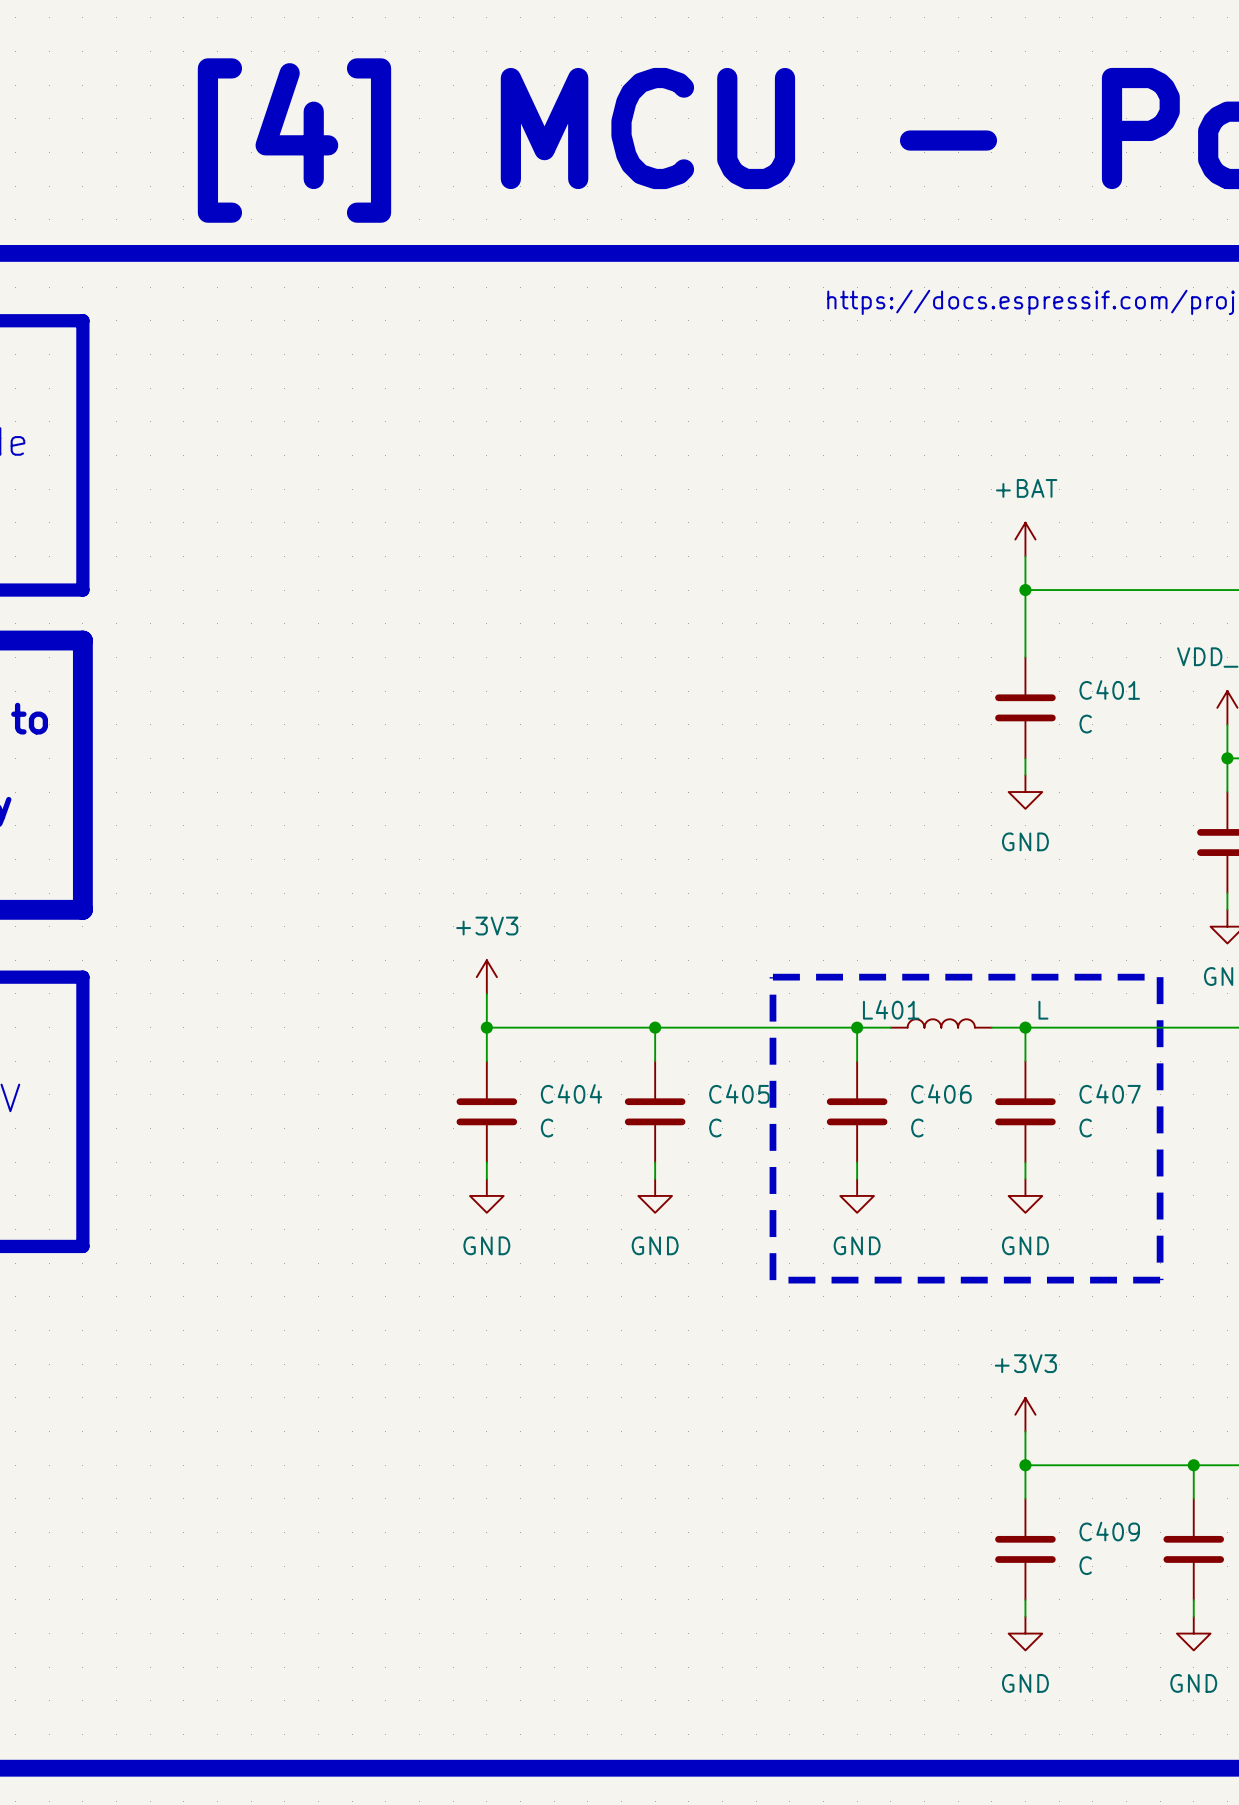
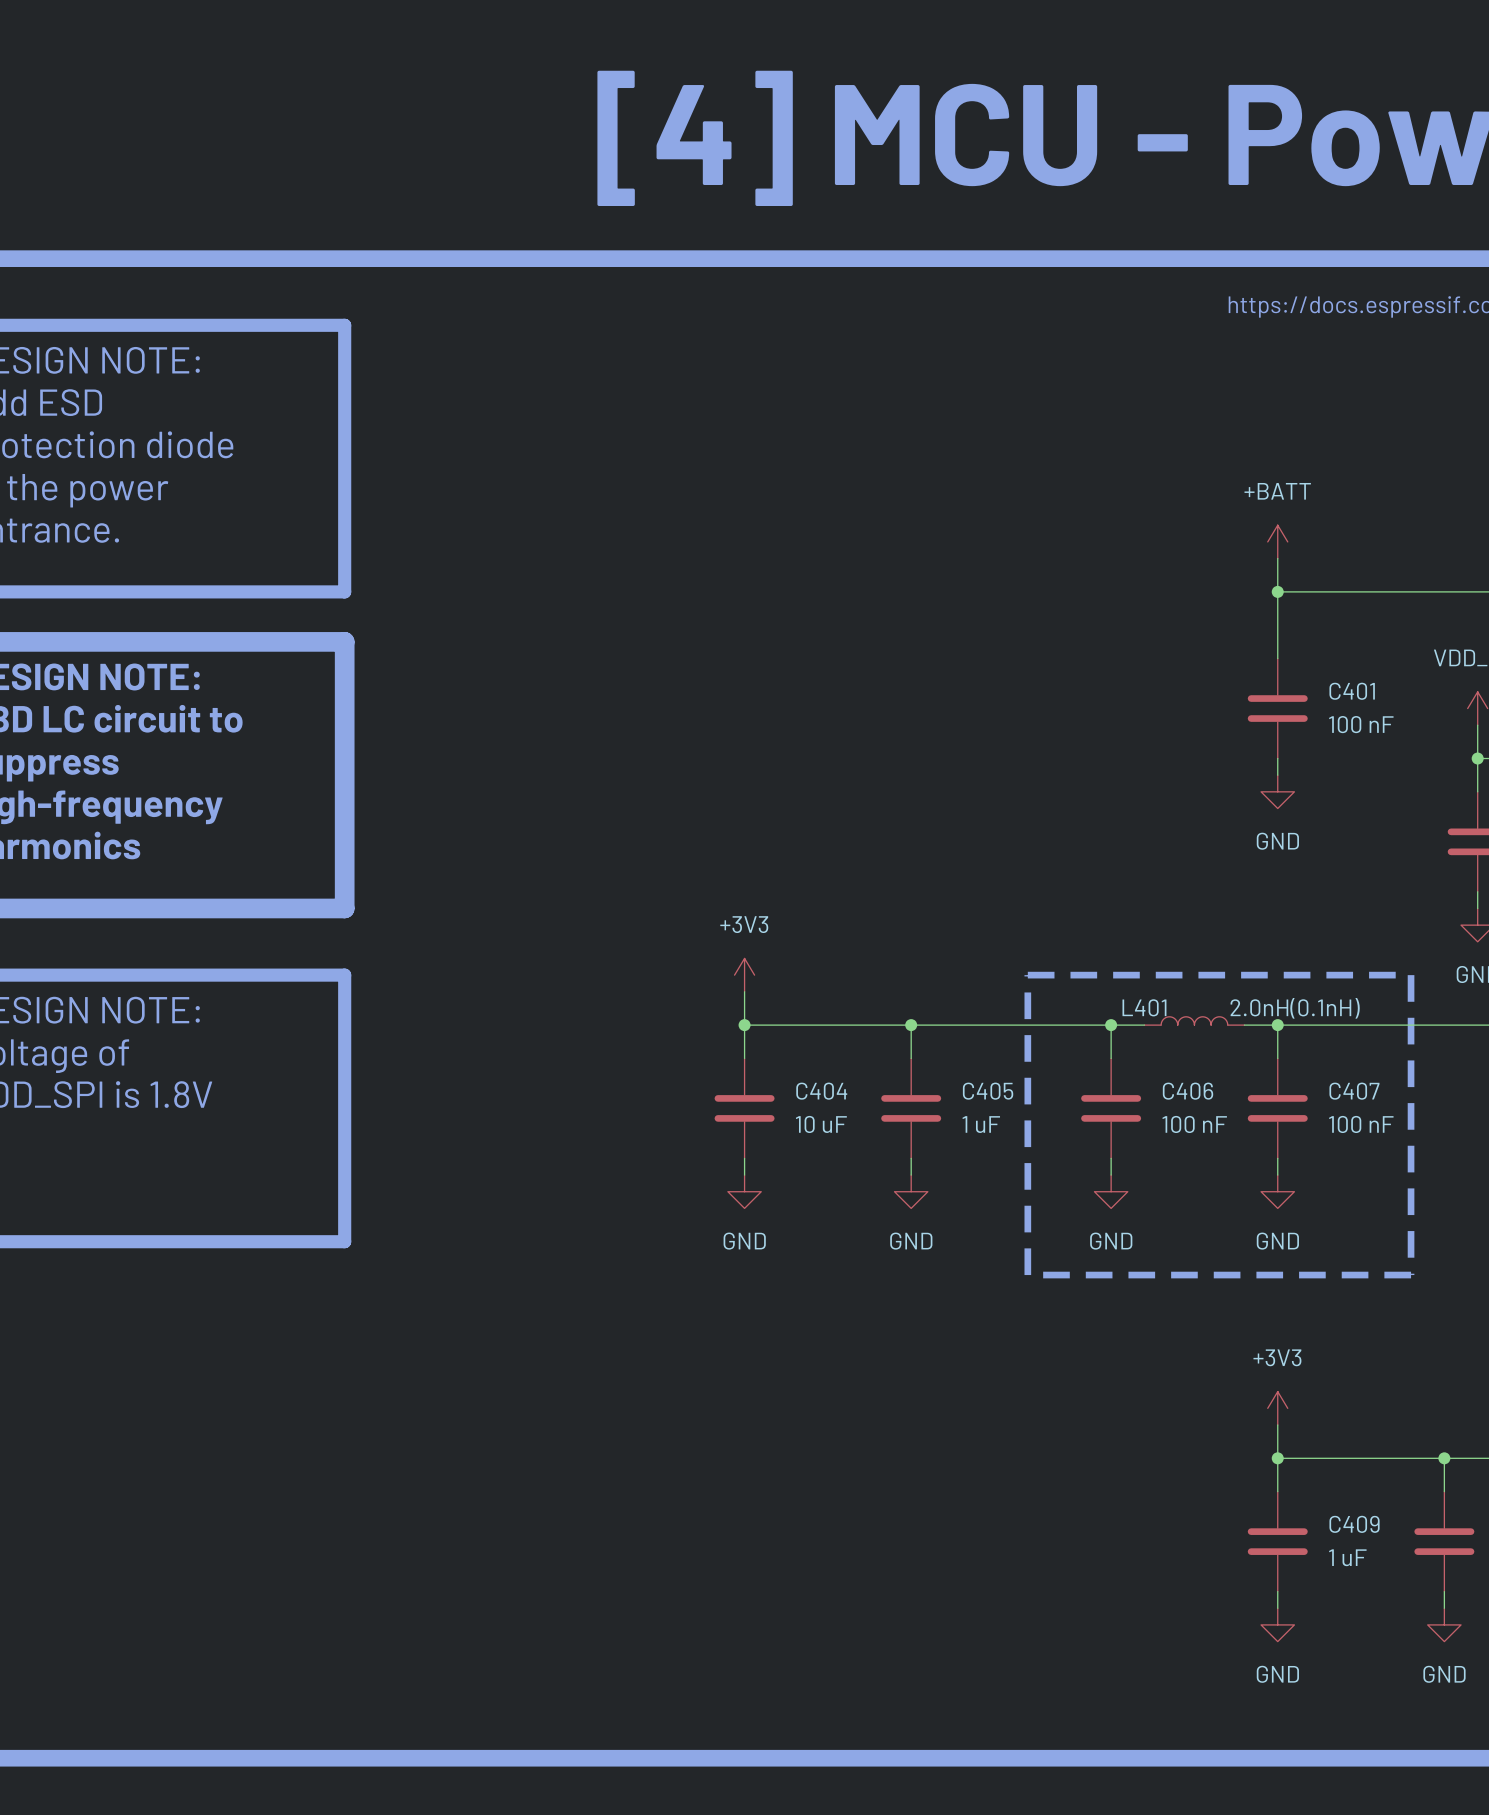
power symbol: +BAT (1025, 539) -> +BATT (1277, 541)
C401 value: C (1085, 724) -> 100 nF (1361, 724)
L401 value: L (1043, 1010) -> 2.0nH(0.1nH) (1295, 1008)
C404 value: C (547, 1128) -> 10 uF (821, 1124)
C405 value: C (715, 1128) -> 1 uF (981, 1124)
C406 value: C (917, 1128) -> 100 nF (1194, 1124)
C407 value: C (1085, 1128) -> 100 nF (1361, 1124)
C409 value: C (1085, 1565) -> 1 uF (1347, 1557)

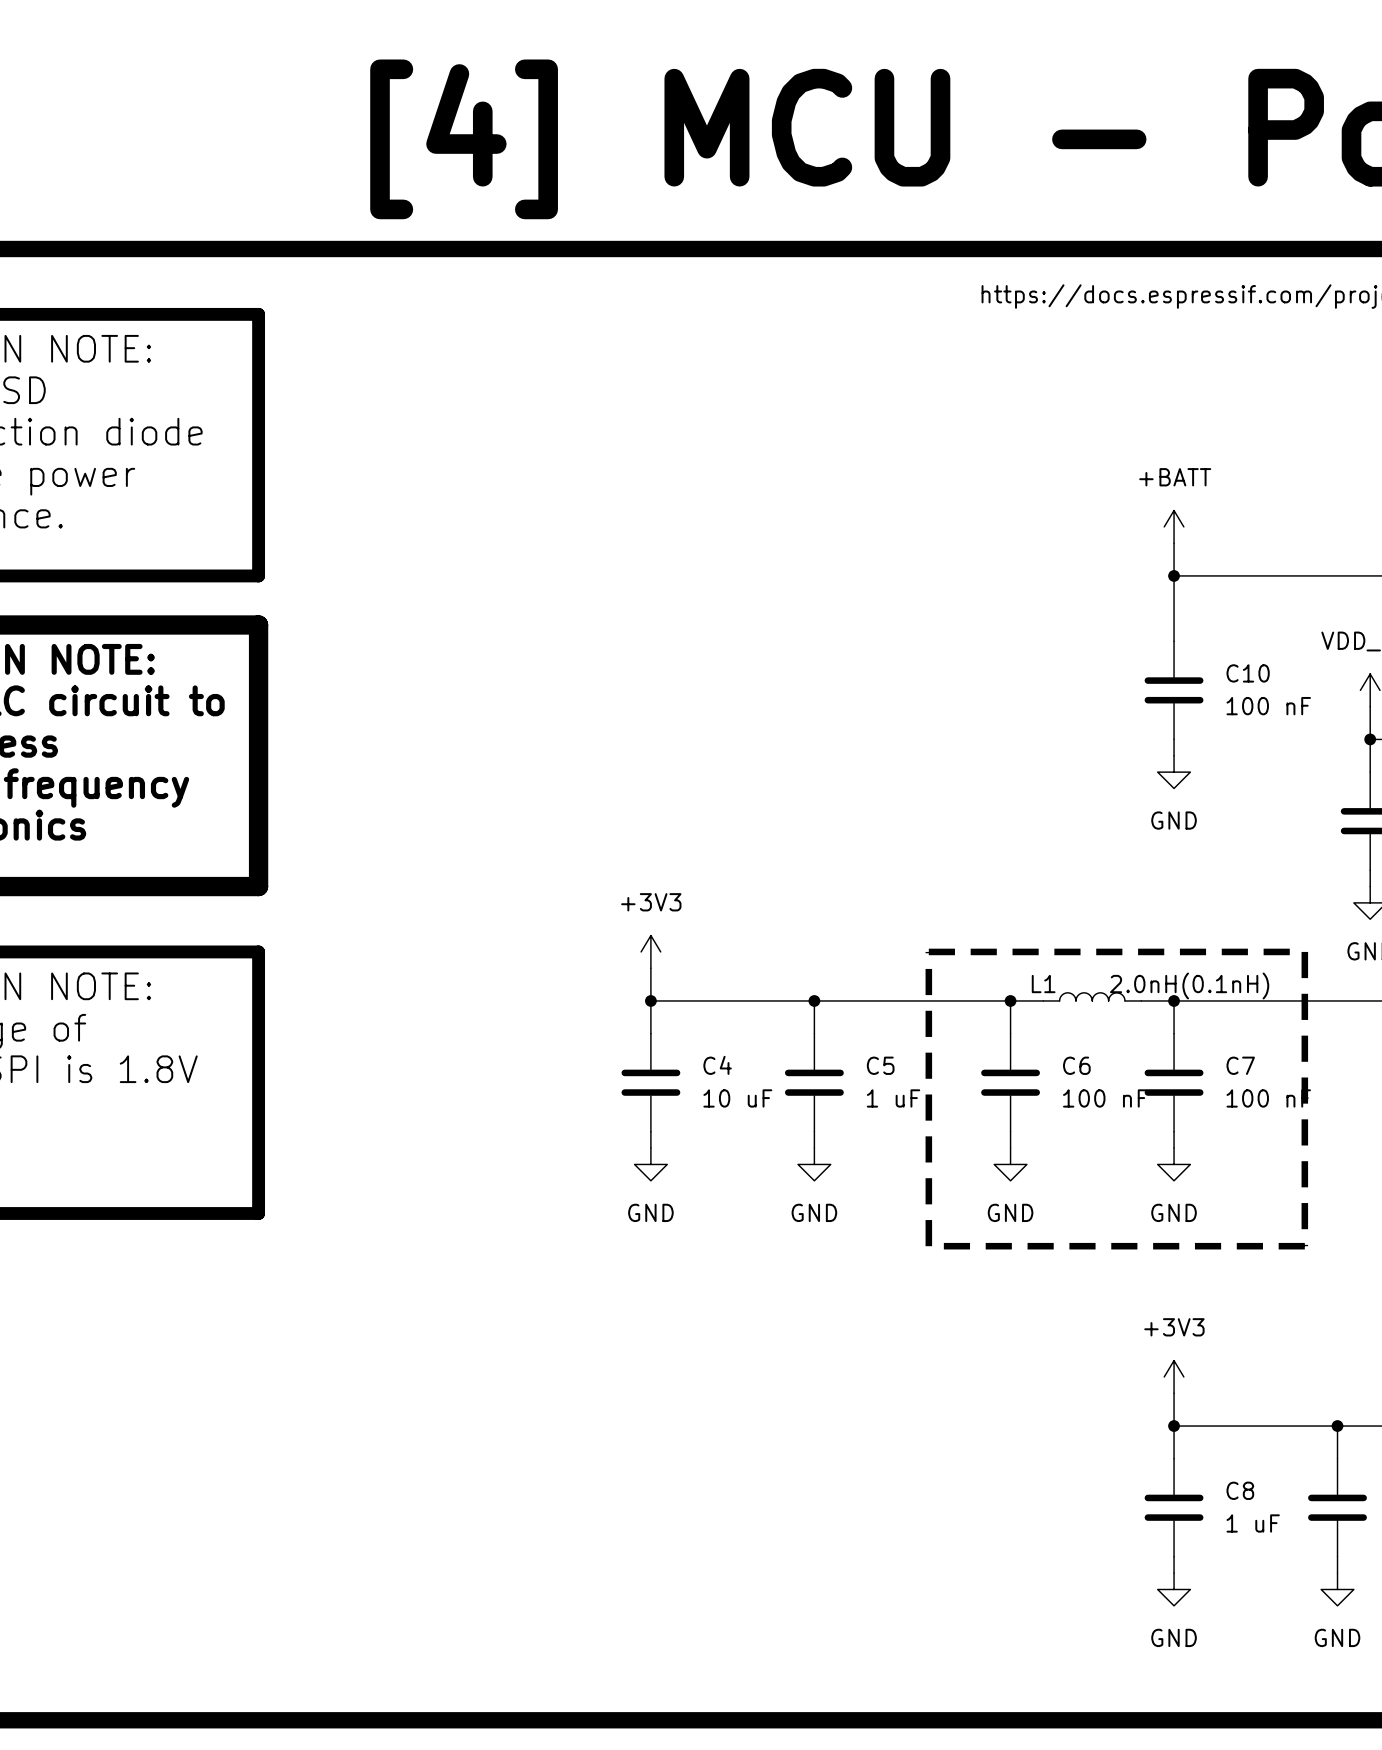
C401 name: C401 (1352, 691) -> C10 (1248, 673)
L401 name: L401 (1144, 1007) -> L1 (1043, 984)
C404 name: C404 (821, 1091) -> C4 (717, 1065)
C405 name: C405 (988, 1091) -> C5 (880, 1065)
C406 name: C406 (1188, 1091) -> C6 (1076, 1065)
C407 name: C407 (1354, 1091) -> C7 (1240, 1065)
C409 name: C409 (1354, 1524) -> C8 (1240, 1490)

